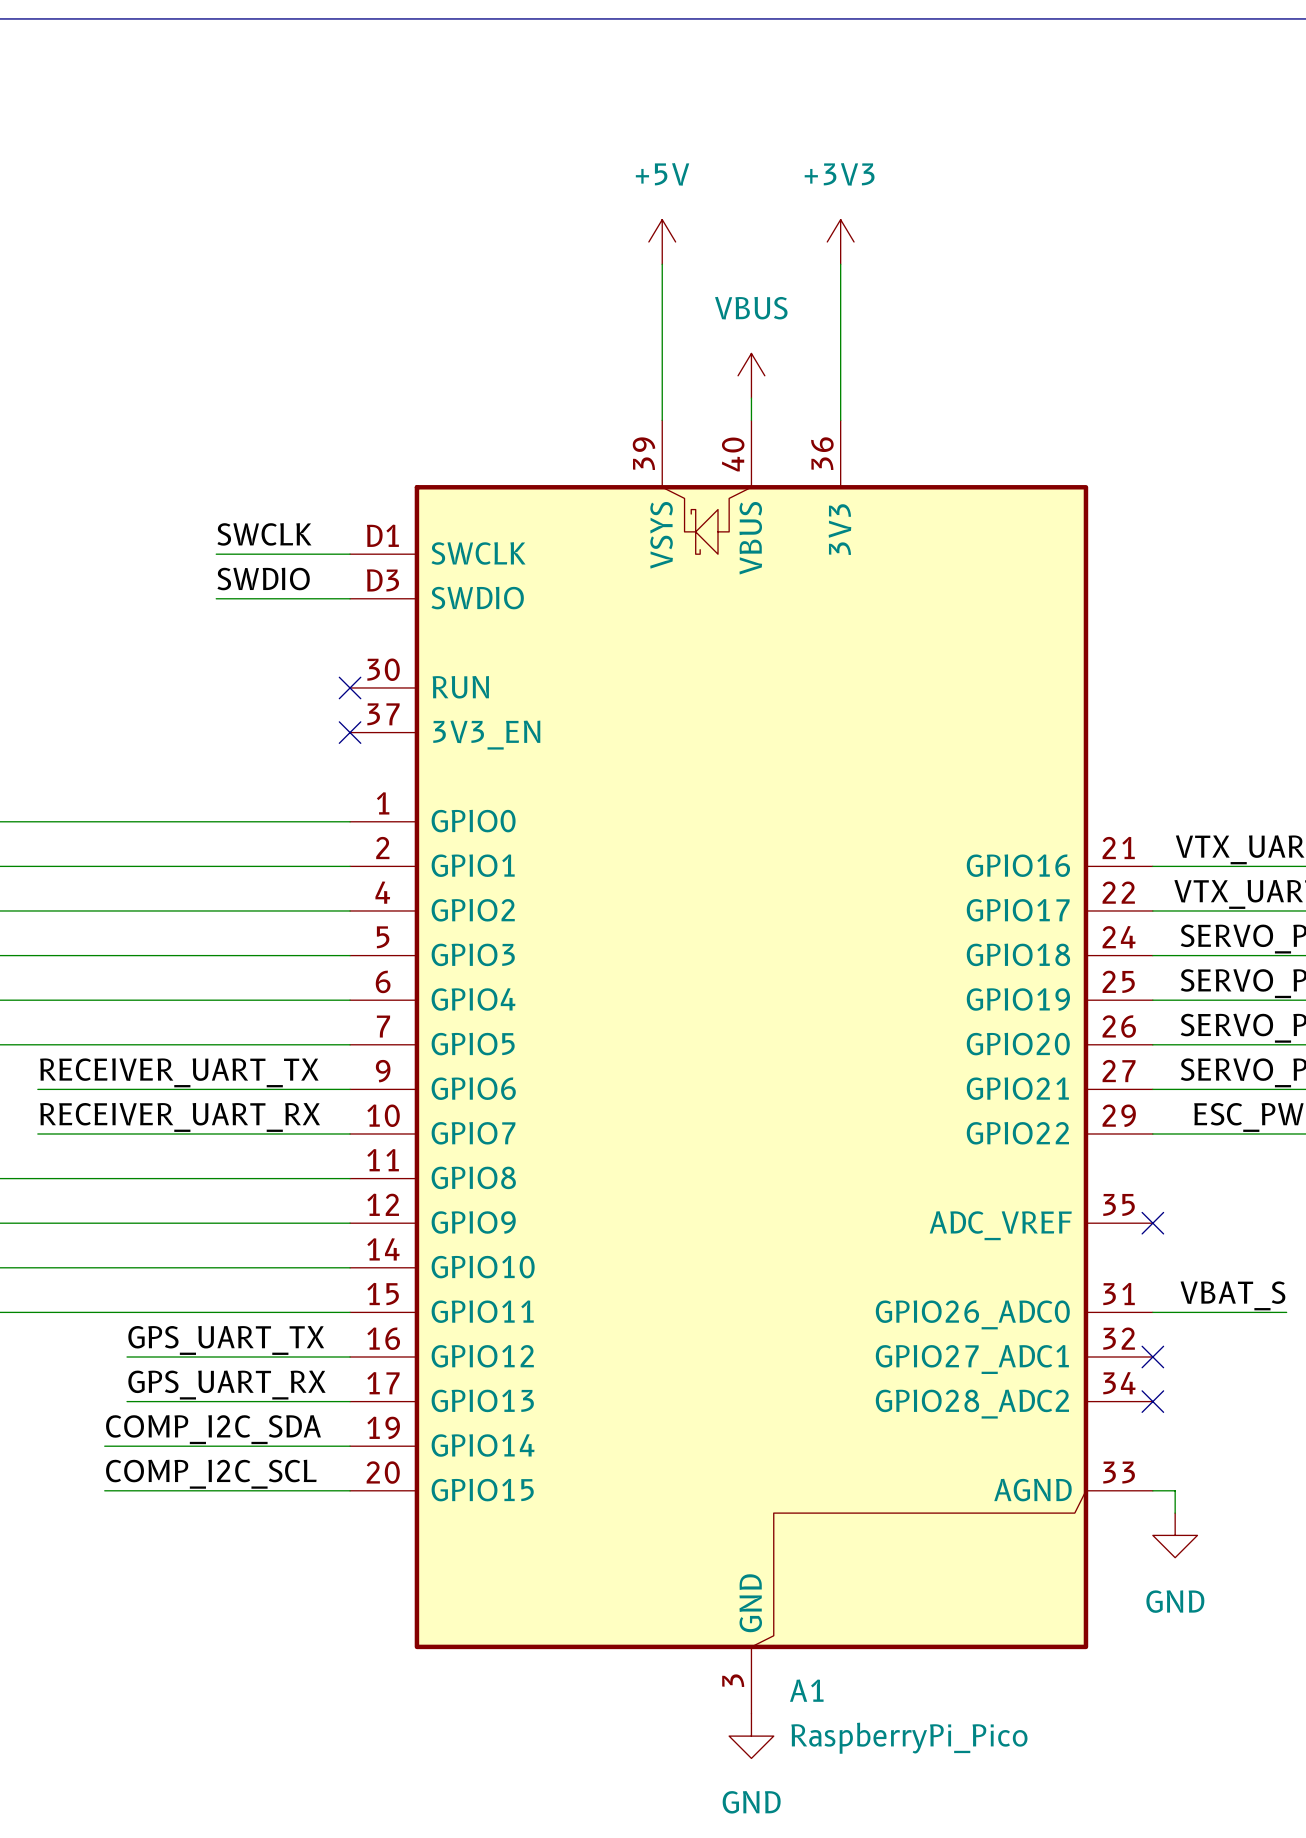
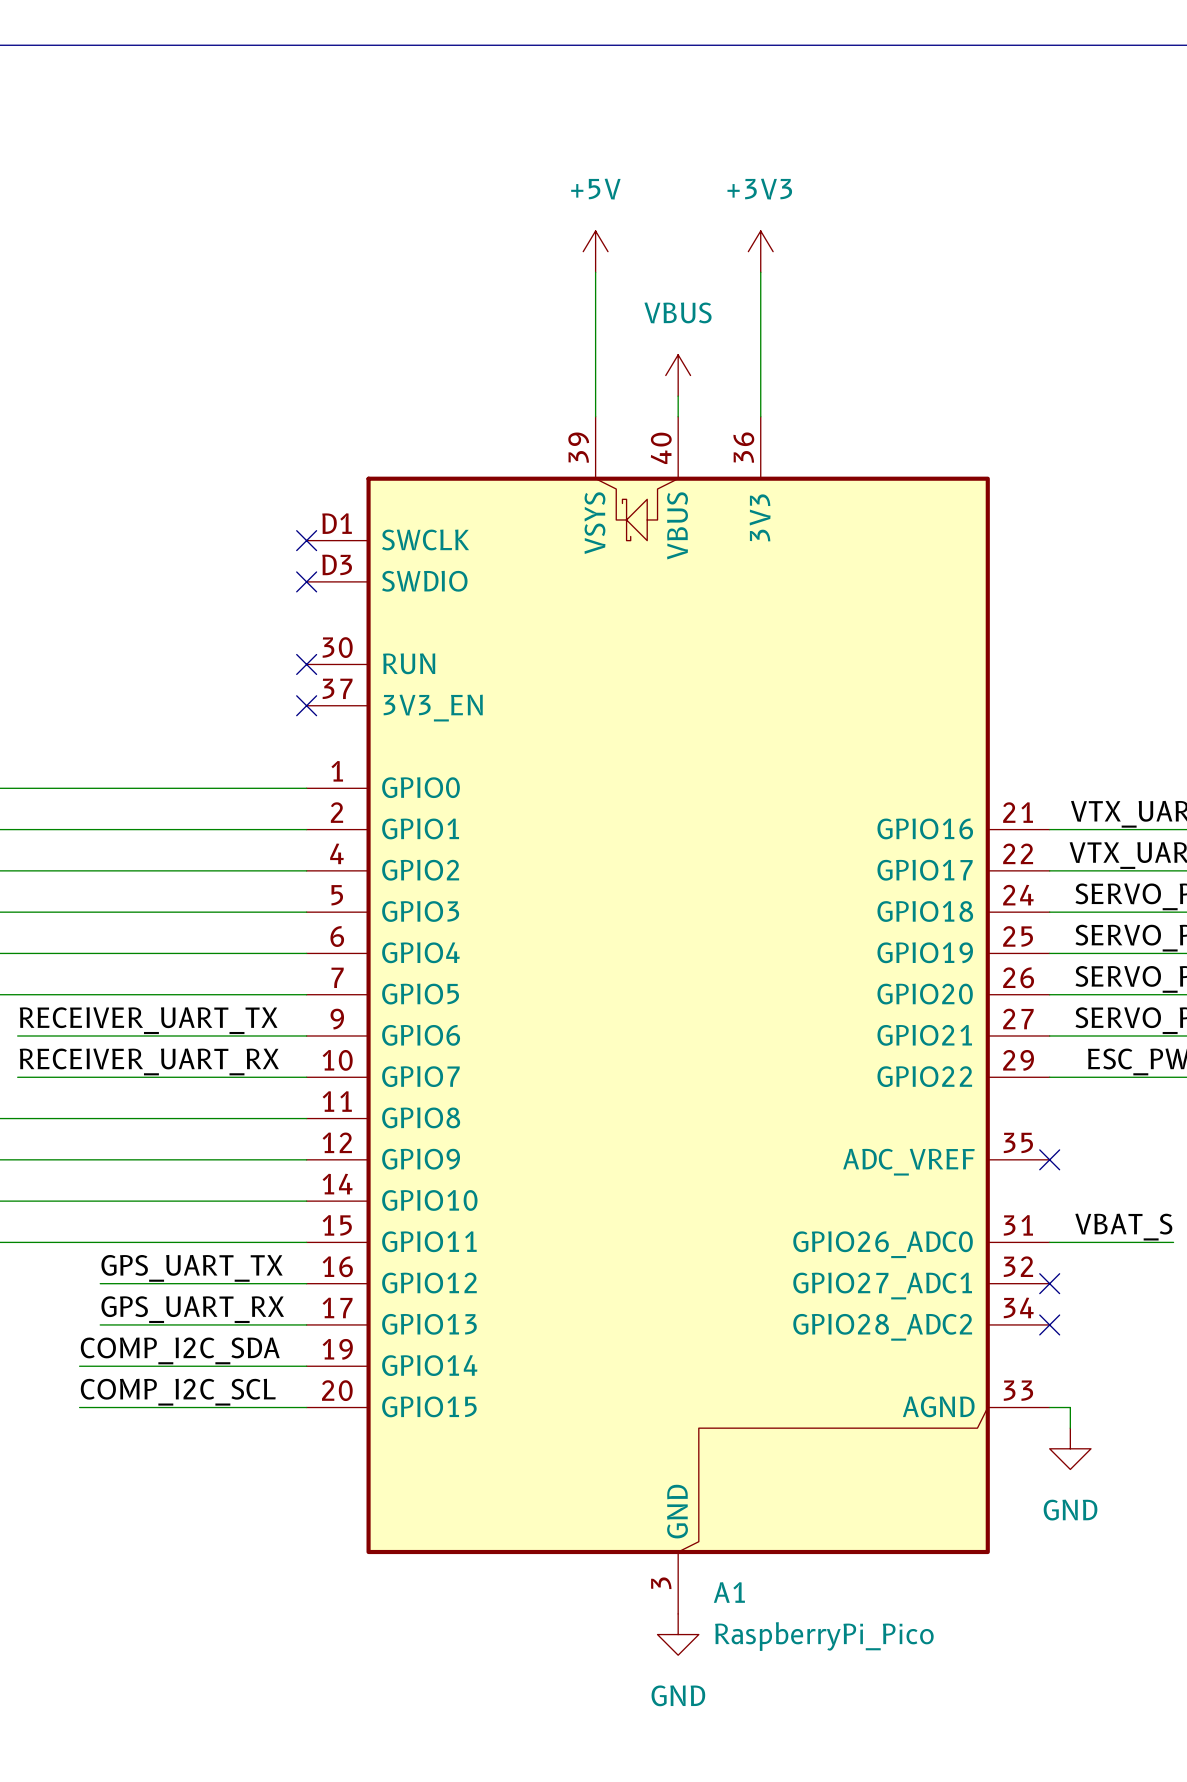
label: SWCLK (264, 534) -> none
wire: (216, 554) (350, 554) -> none
no-connect mark: none -> (306, 540)
label: SWDIO (263, 579) -> none
wire: (216, 598) (350, 598) -> none
no-connect mark: none -> (306, 581)

